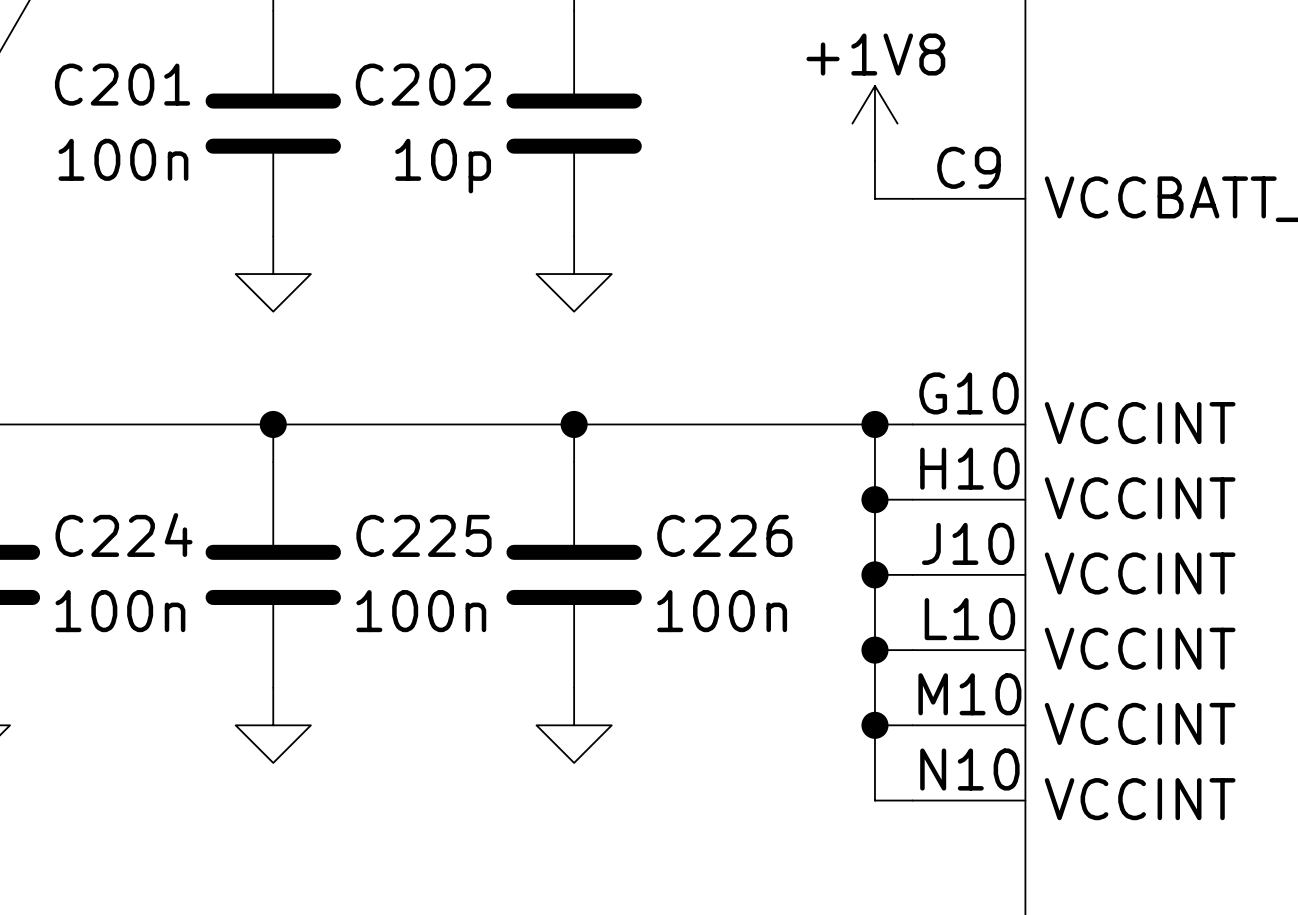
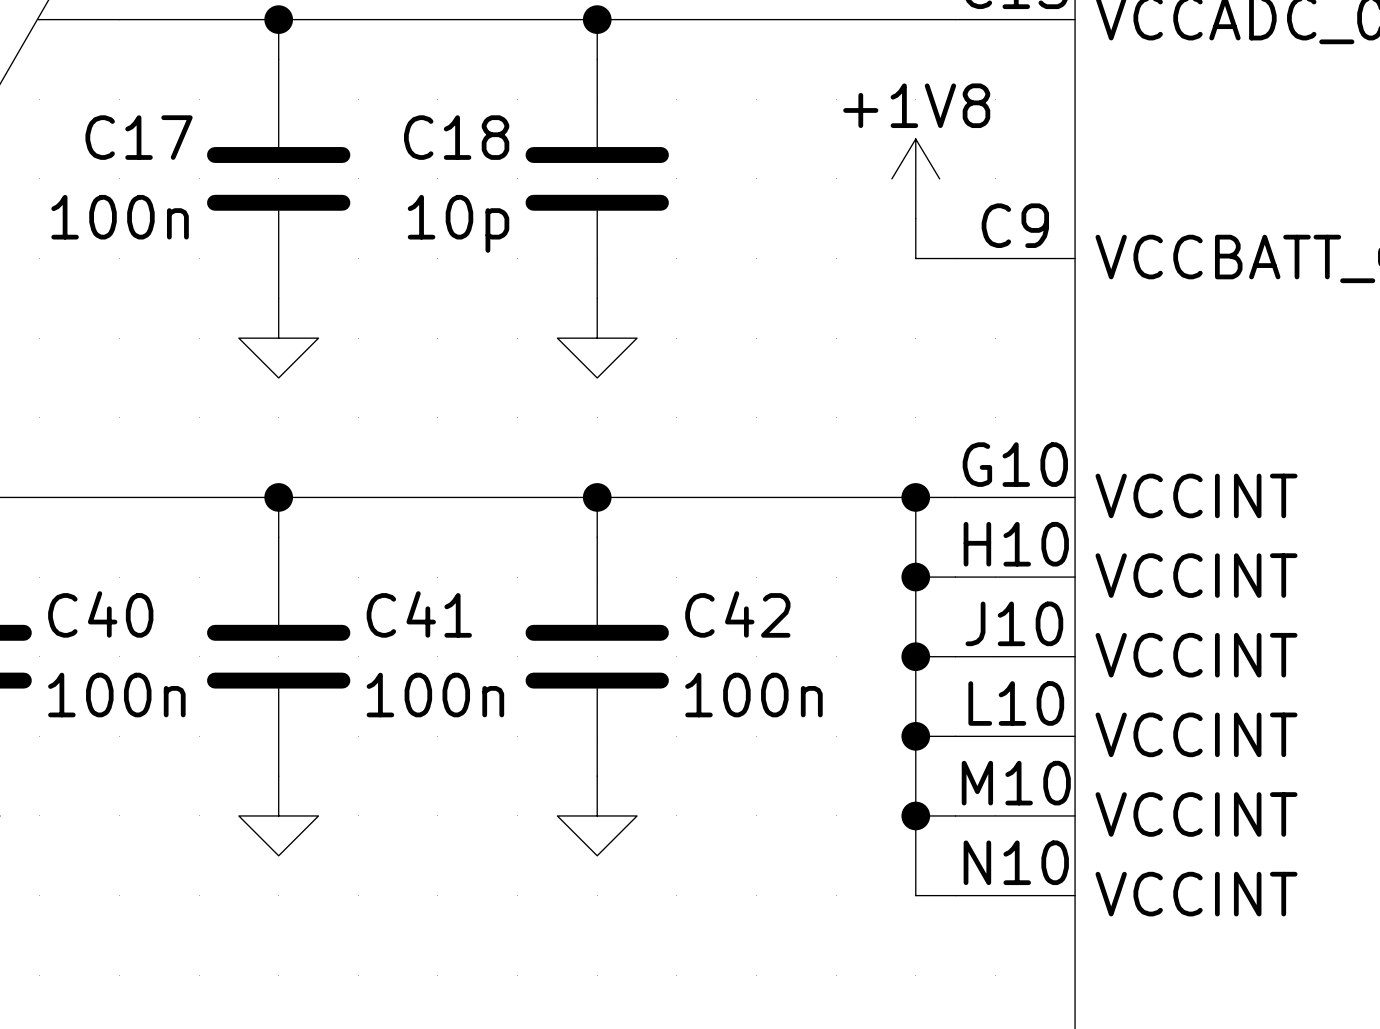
C201 name: C201 (122, 84) -> C17 (139, 137)
C202 name: C202 (423, 84) -> C18 (456, 137)
C224 name: C224 (124, 534) -> C40 (100, 614)
C225 name: C225 (423, 535) -> C41 (419, 614)
C226 name: C226 (724, 535) -> C42 (737, 614)

